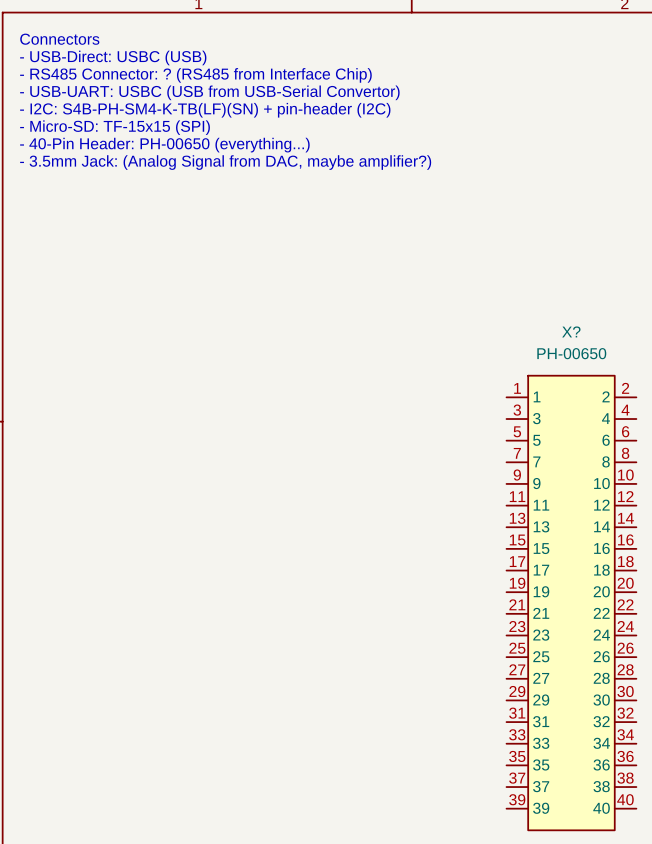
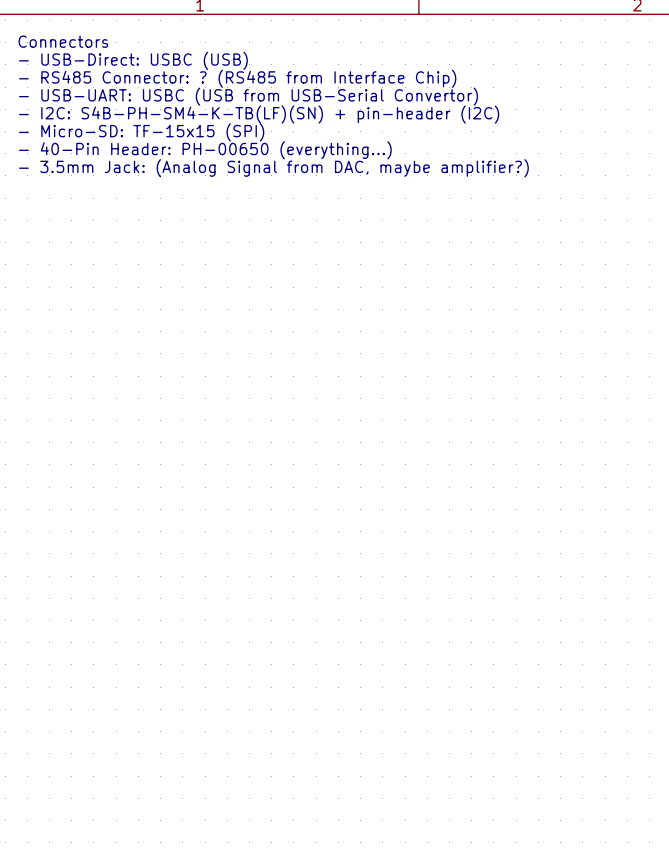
X?: PH-00650 (571, 603) -> none

